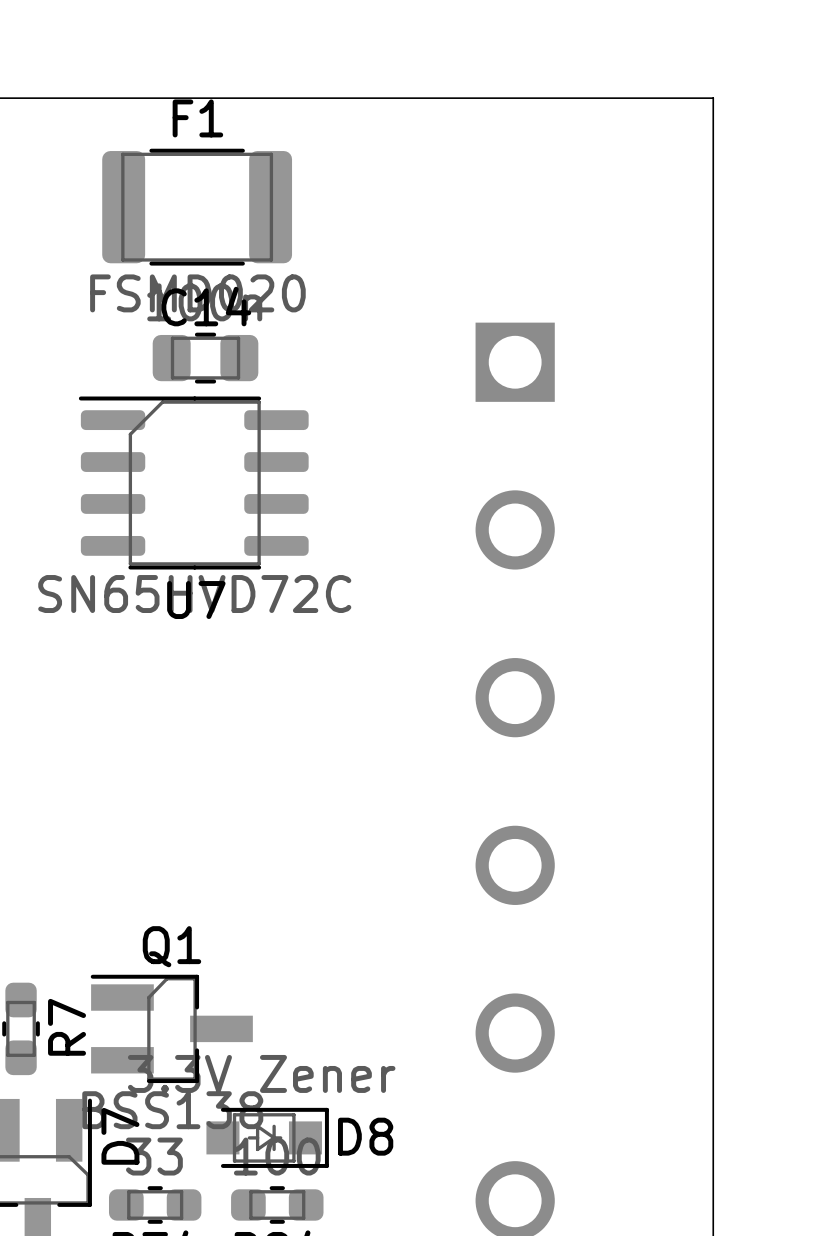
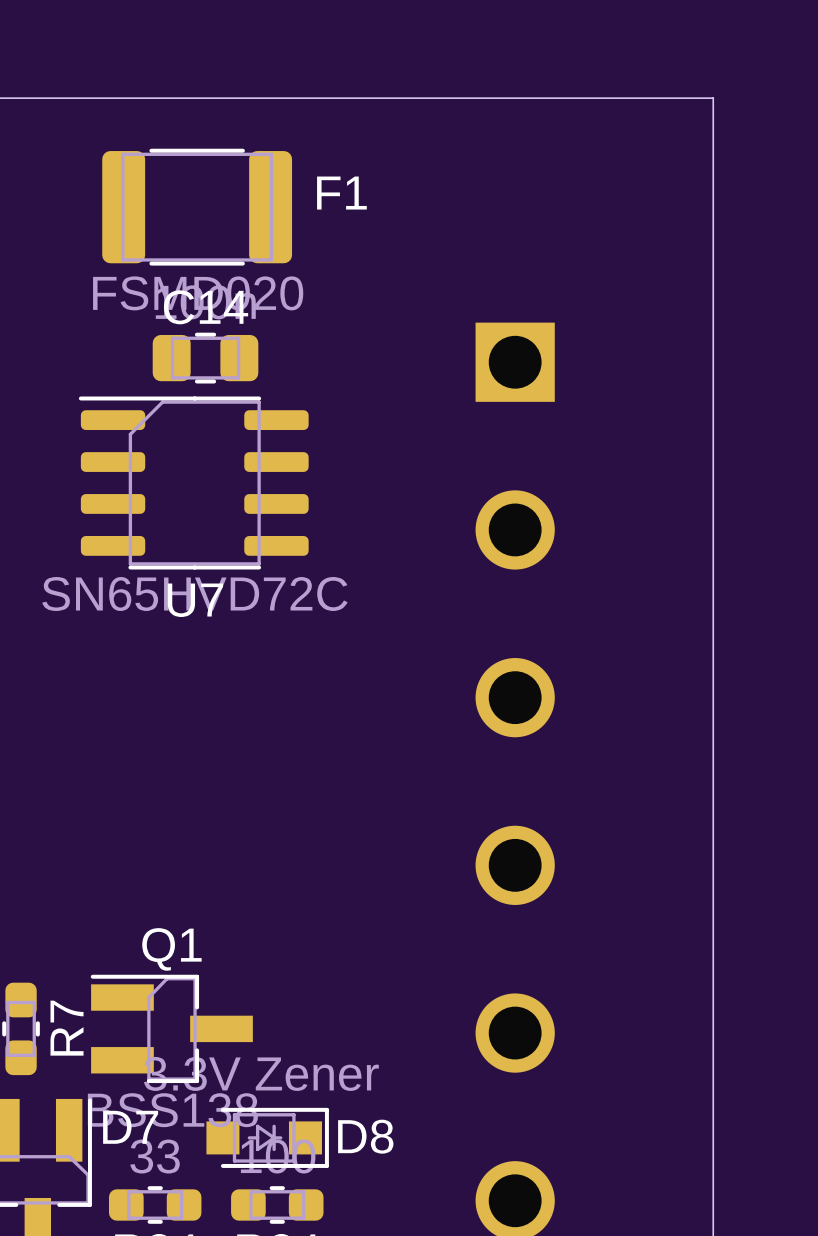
F1 name position: F1 (197, 118) -> F1 (341, 193)
D7 name rotation: 0° (120, 1136) -> 90° clockwise (130, 1127)

